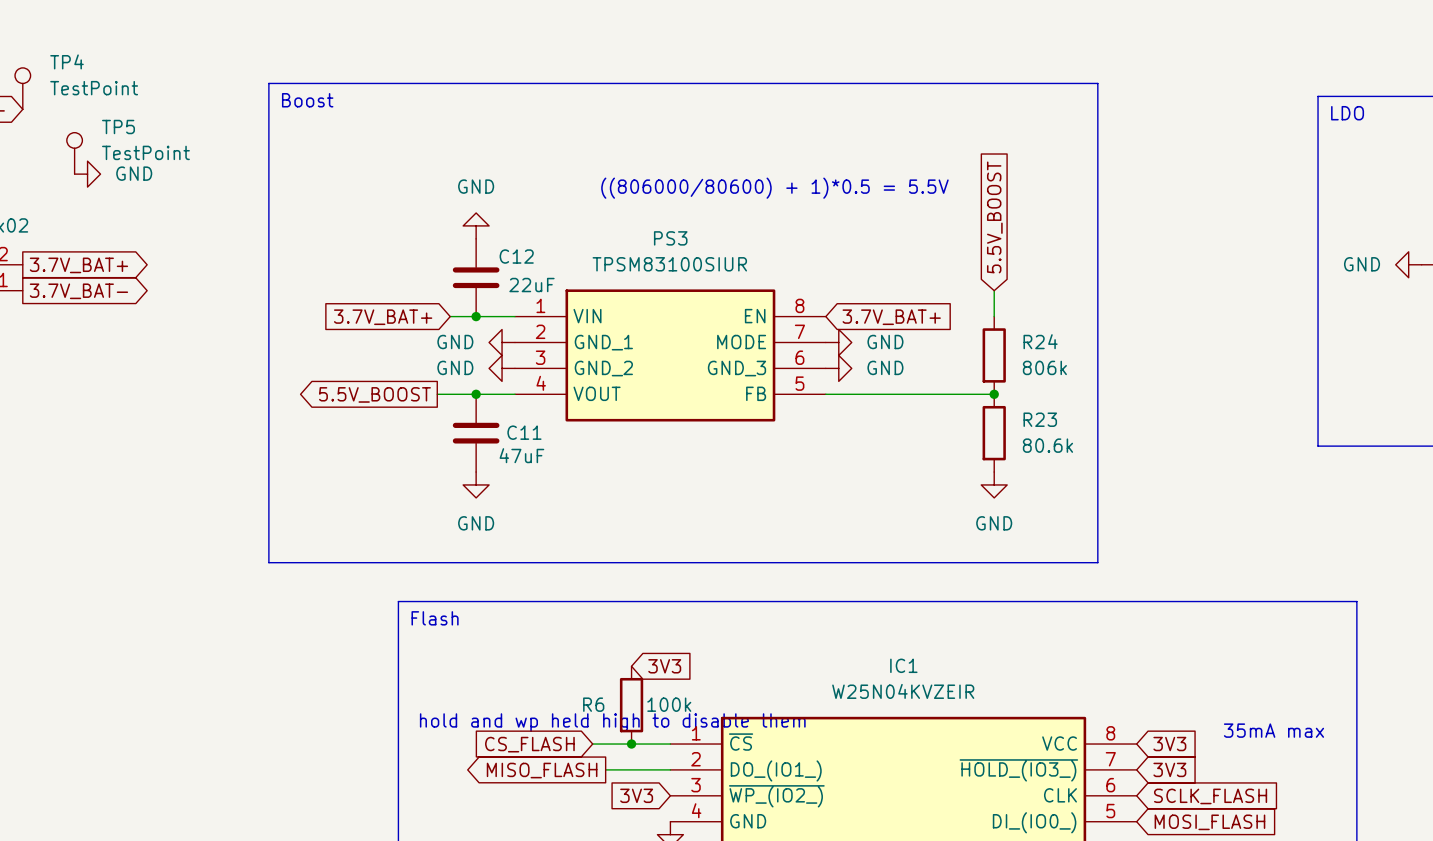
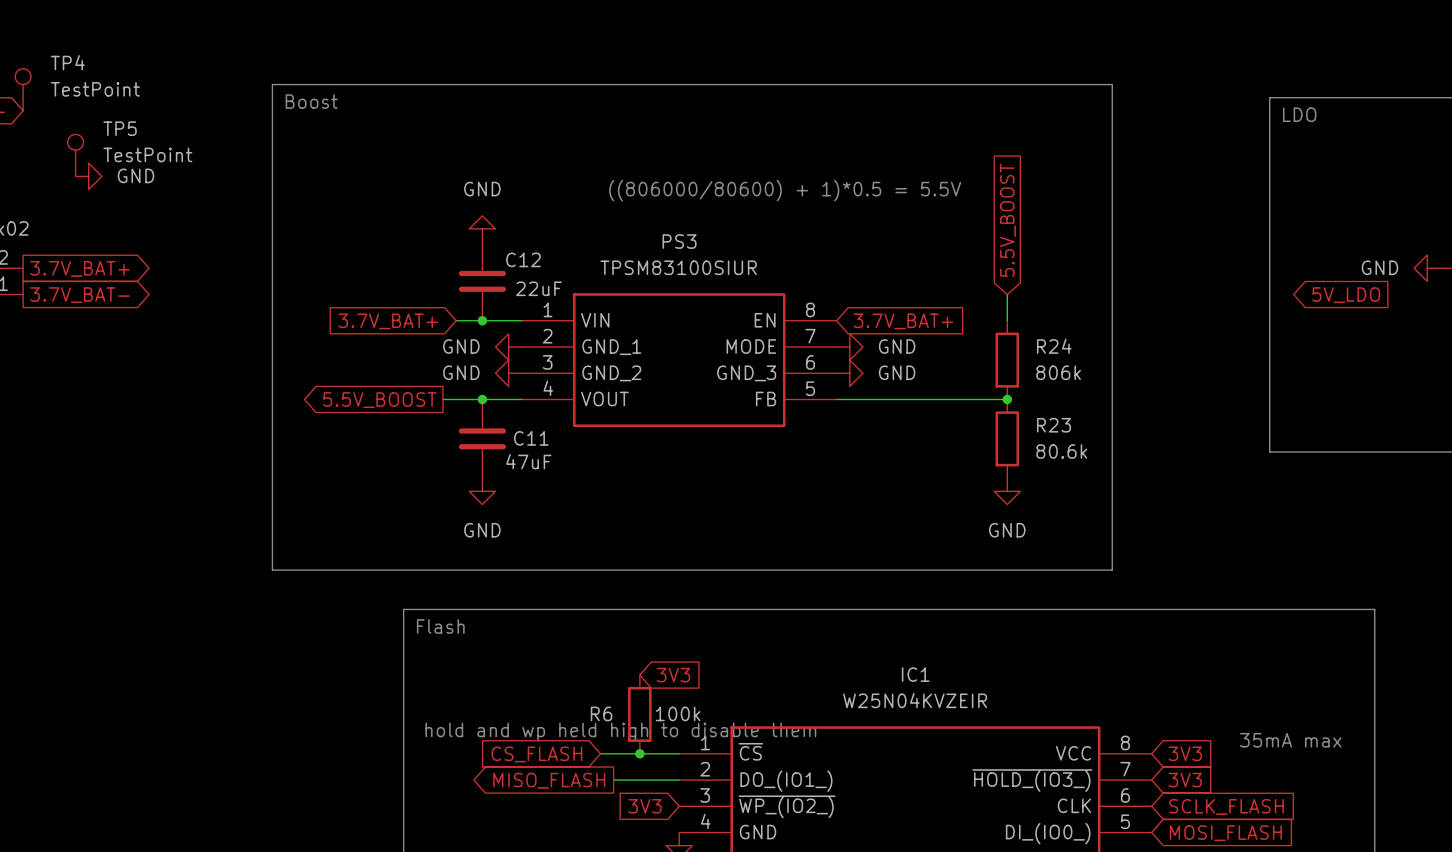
line: (1318, 96) (1318, 446) -> (1335, 97) (1269, 97) (1269, 451) (1335, 451)
text position: LDO (1347, 113) -> LDO (1299, 114)
global label: none -> 5V_LDO (1346, 295)

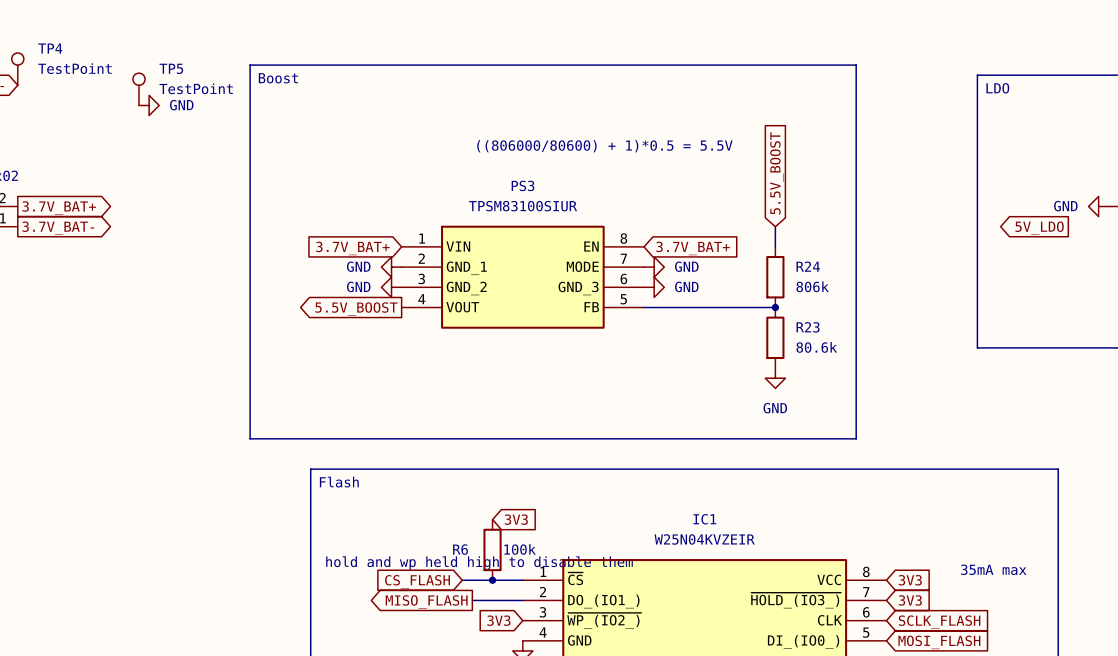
line: (324, 84) (272, 84) (272, 570) (324, 570) -> (250, 65) (250, 438)
text position: Boost (311, 101) -> Boost (278, 78)
TP5 position: (75, 155) -> (139, 89)
power symbol position: GND (88, 176) -> GND (149, 105)
power symbol: GND (482, 228) -> none
C12: 22uF (482, 281) -> none
wire: (456, 320) (521, 320) -> none
junction: (482, 320) -> none
global label position: 3.7V_BAT+ (388, 321) -> 3.7V_BAT+ (352, 248)
wire: (443, 399) (521, 399) -> none
junction: (482, 399) -> none
global label position: 5.5V_BOOST (379, 400) -> 5.5V_BOOST (356, 309)
C11: 47uF (482, 438) -> none
power symbol: GND (482, 491) -> none

